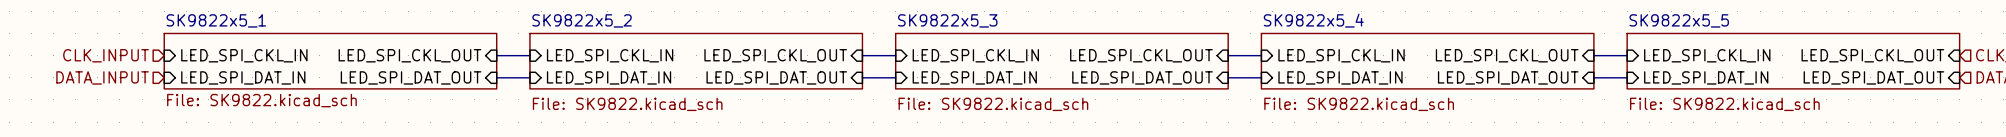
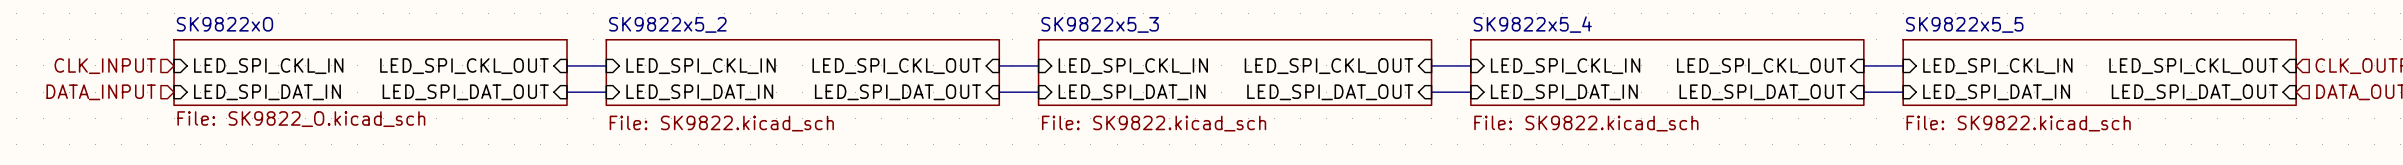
sheet SK9822x5_1 name: SK9822x5_1 (216, 20) -> SK9822xO (224, 24)
sheet SK9822x5_1 value: File: SK9822.kicad_sch (261, 100) -> File: SK9822_O.kicad_sch (301, 119)

